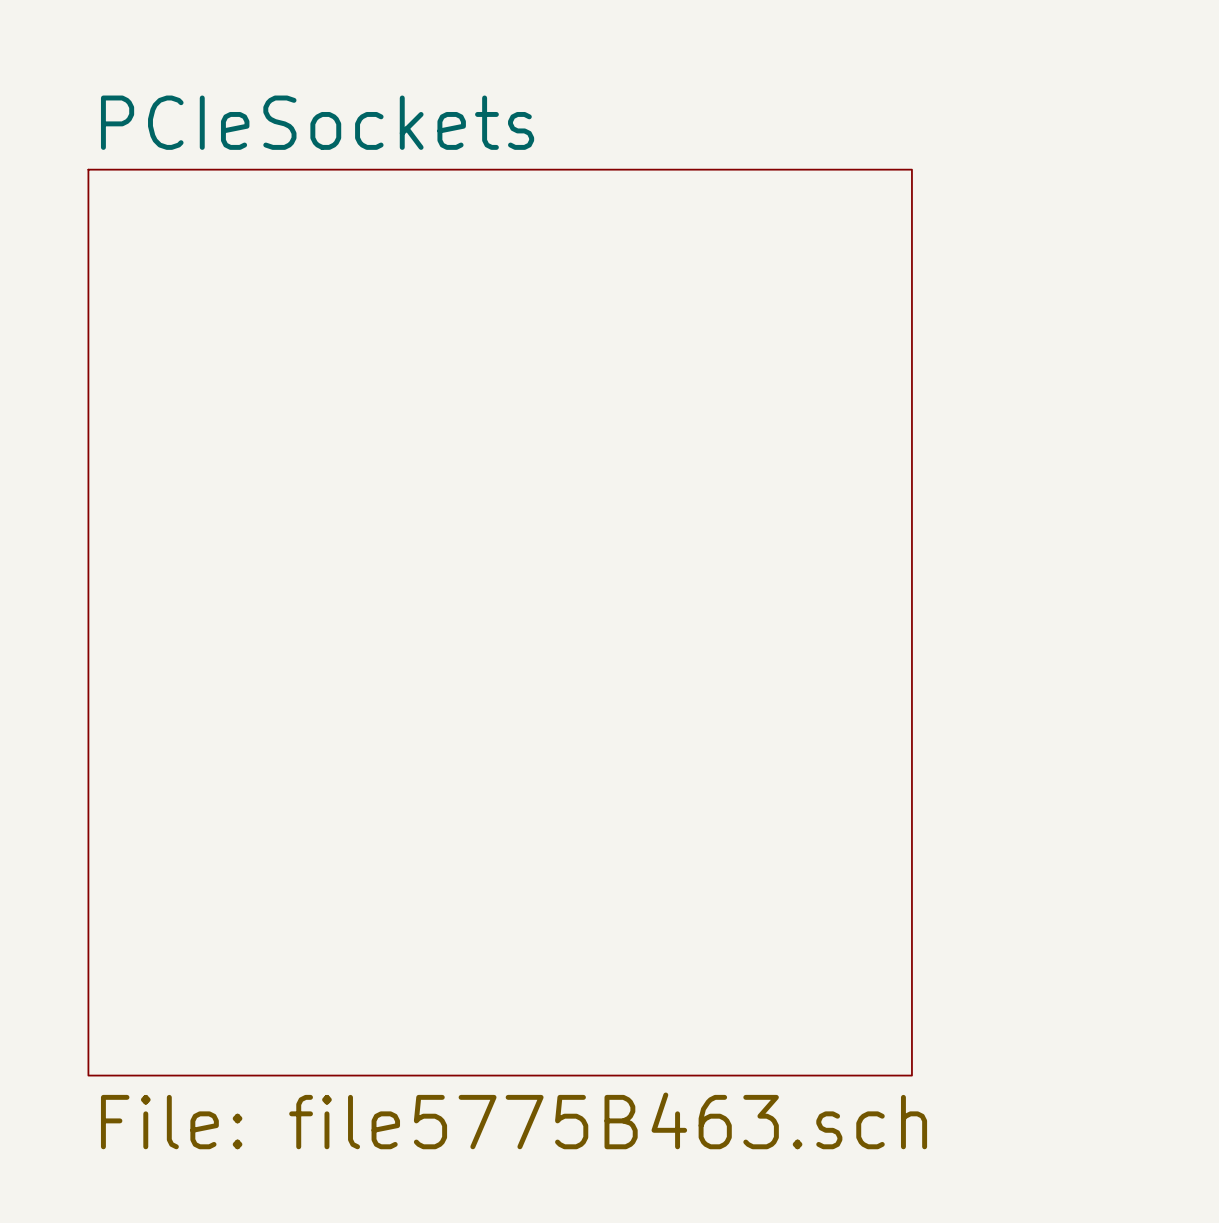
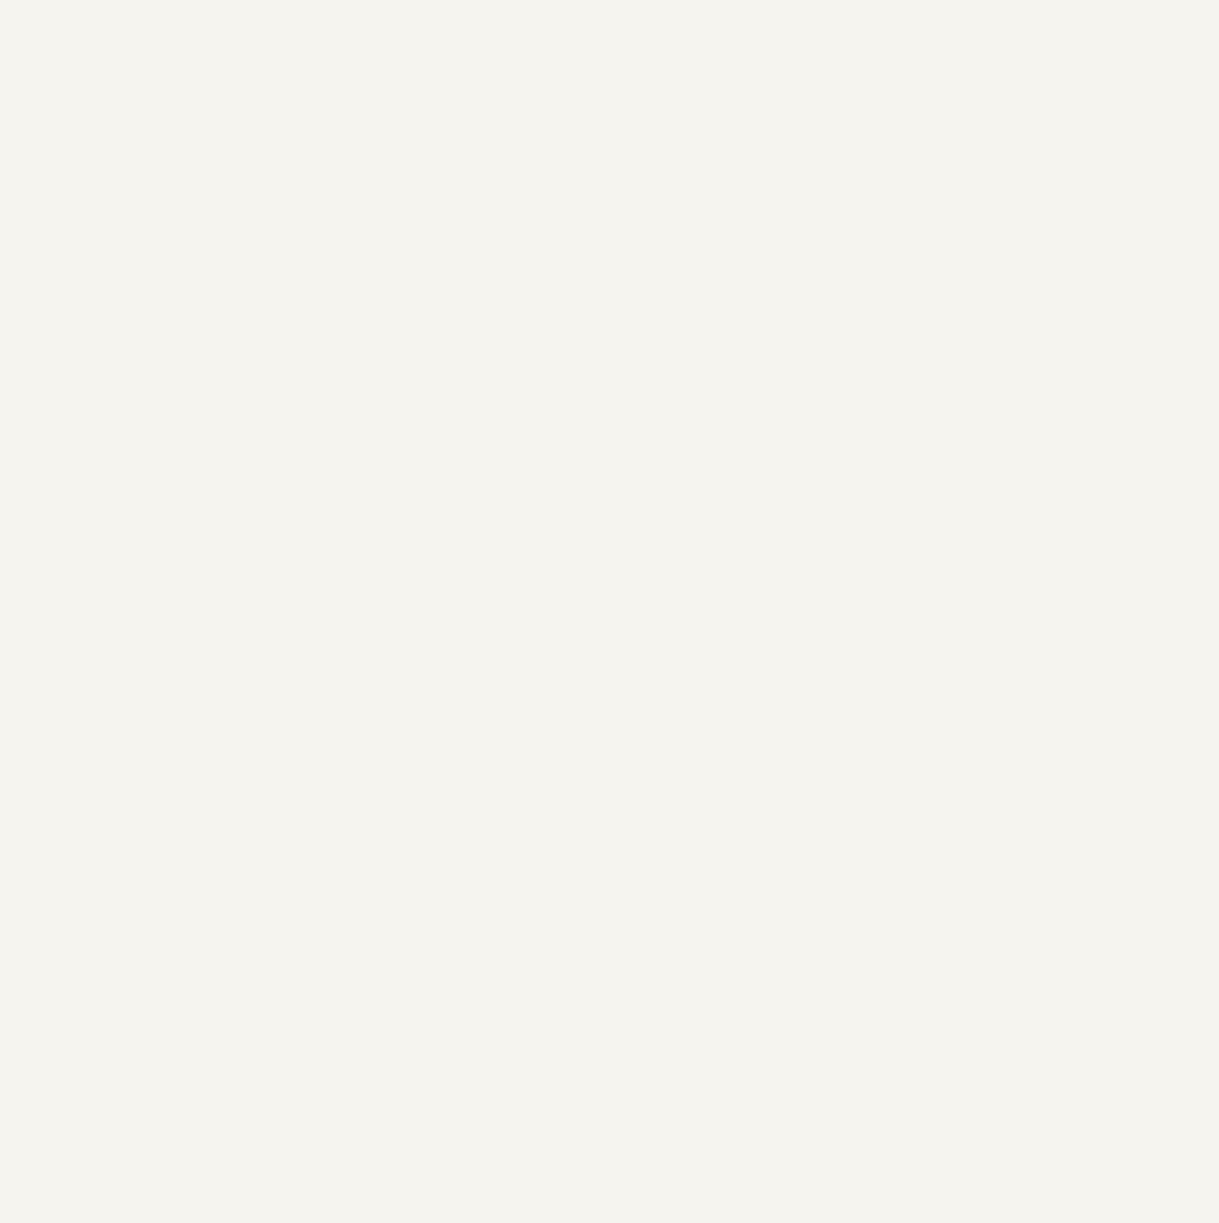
sheet PCIeSockets: File: file5775B463.sch (500, 622) -> none

